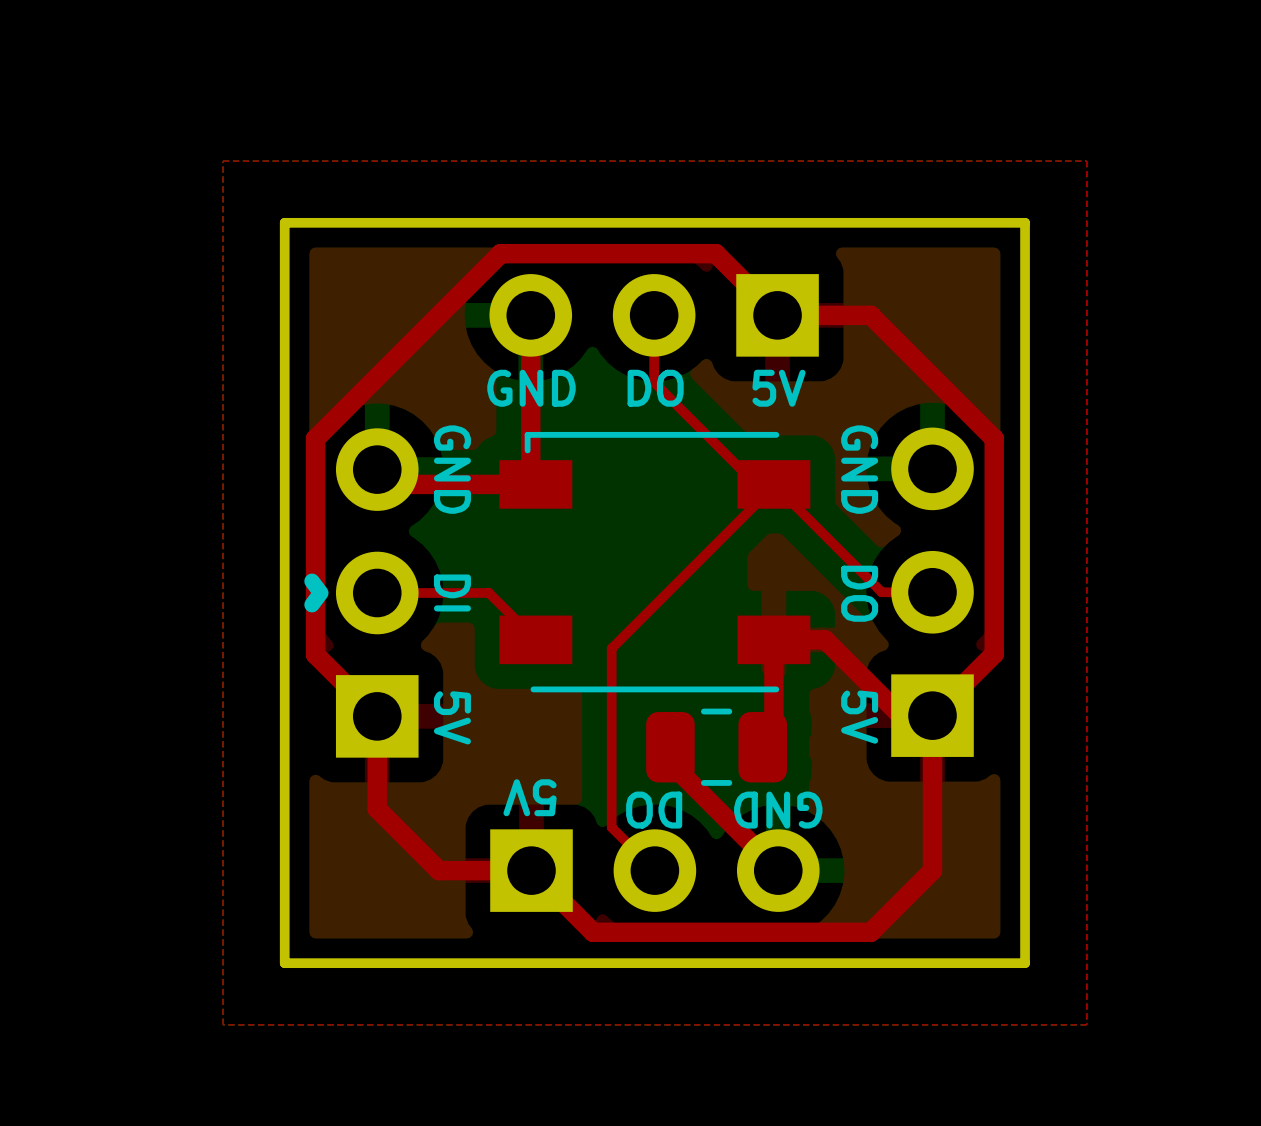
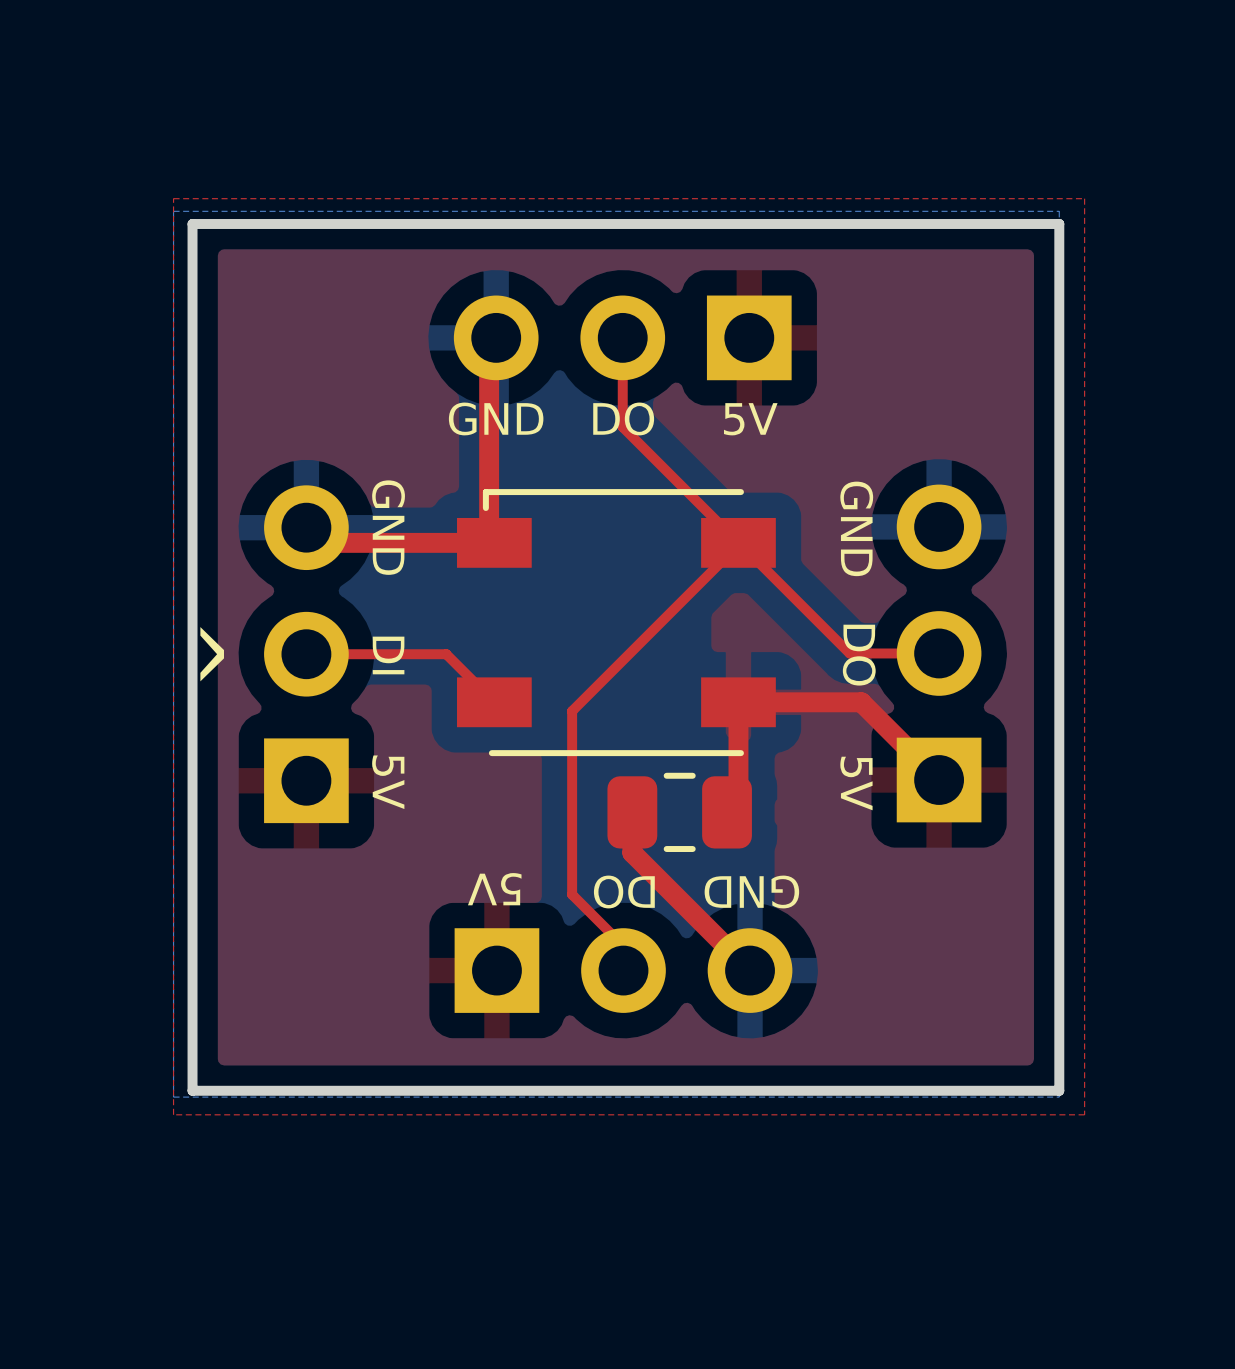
top zone outline: (223, 161) (1086, 161) (1086, 1024) (223, 1024) -> (173, 211) (173, 198) (1084, 198) (1084, 1114) (173, 1114) (173, 1097)
board edge: (284, 222) (284, 963) (1025, 963) (1025, 222) (284, 222) -> (192, 223) (192, 1090) (1059, 1090) (1059, 223) (192, 223)
top track: none -> (622, 337) (622, 427) (738, 542)
top track: (654, 315) (654, 382) (756, 484) (773, 484) (881, 592) -> (739, 542) (849, 653)
part position: (654, 315) -> (622, 337)
text position: GND (531, 388) -> GND (496, 418)
text position: DO (655, 388) -> DO (623, 418)
text position: 5V (779, 388) -> 5V (750, 419)
text position: GND (452, 469) -> GND (388, 527)
text position: GND (859, 469) -> GND (856, 528)
text position: ^ (316, 592) -> ^ (212, 654)
part position: (377, 592) -> (306, 654)
text position: DI (452, 592) -> DI (388, 655)
part position: (932, 592) -> (939, 653)
text position: DO (859, 593) -> DO (859, 655)
top track: (825, 639) (901, 716) (931, 716) (994, 653) (994, 438) (870, 315) (777, 315) (715, 253) (500, 253) (315, 438) (315, 654) (377, 716) (377, 808) (438, 870) (531, 870) (593, 932) (870, 932) (932, 870) (932, 715) -> (791, 702) (861, 702) (939, 780)
text position: 5V (452, 717) -> 5V (388, 782)
text position: 5V (859, 717) -> 5V (856, 783)
top track: (670, 762) (778, 870) -> (632, 828) (632, 852) (750, 970)
text position: 5V (530, 797) -> 5V (494, 889)
text position: DO (654, 810) -> DO (624, 892)
text position: GND (778, 810) -> GND (751, 892)
part position: (654, 870) -> (623, 970)

